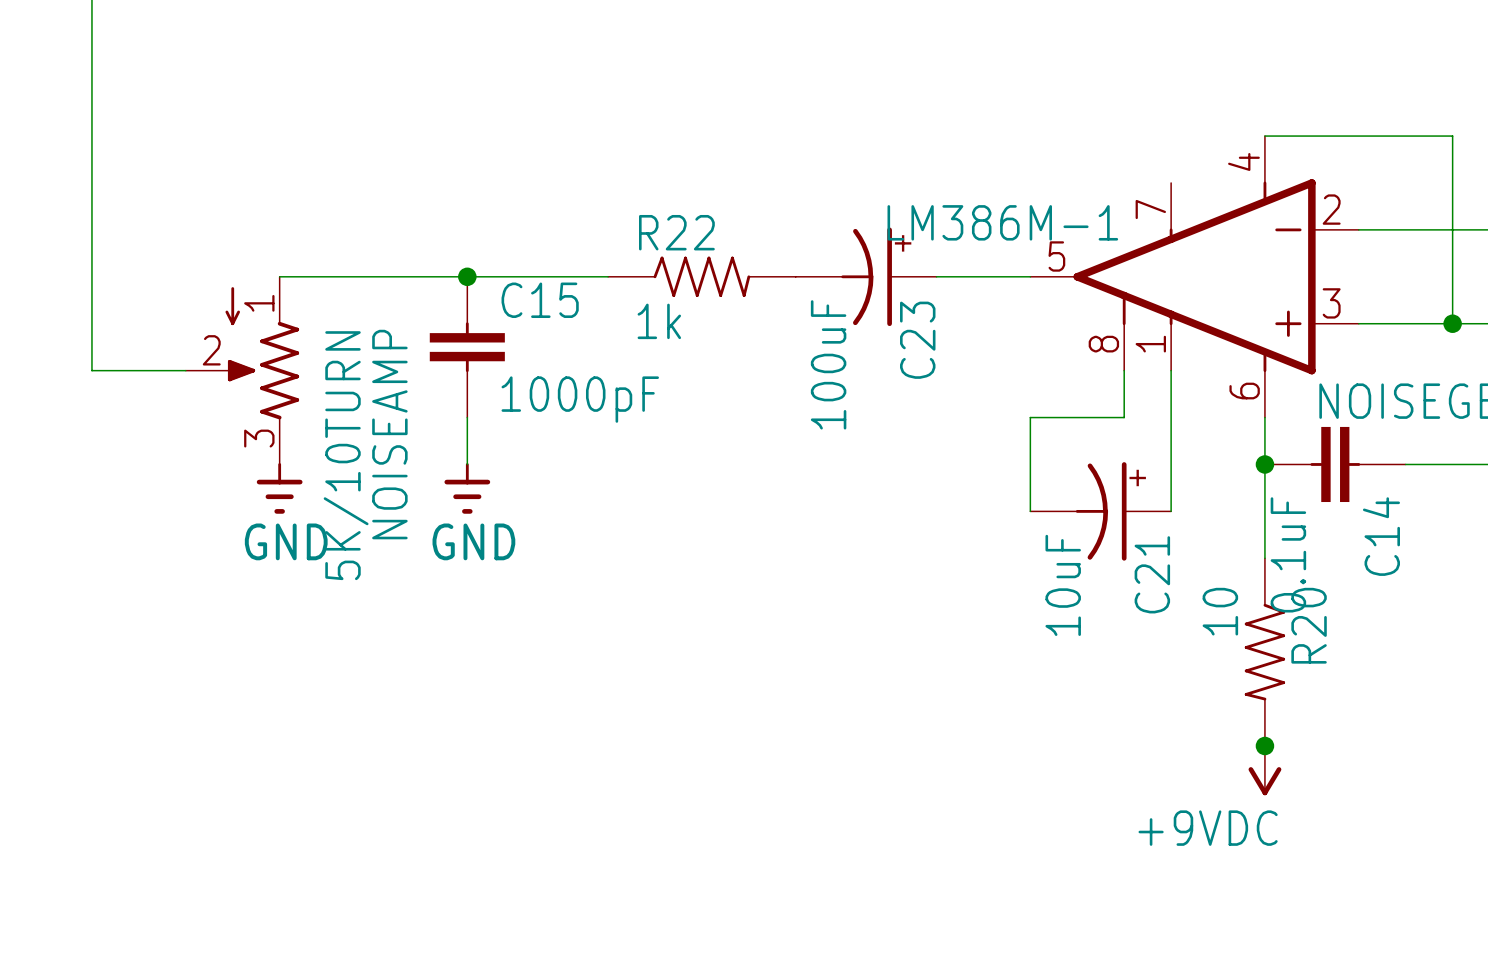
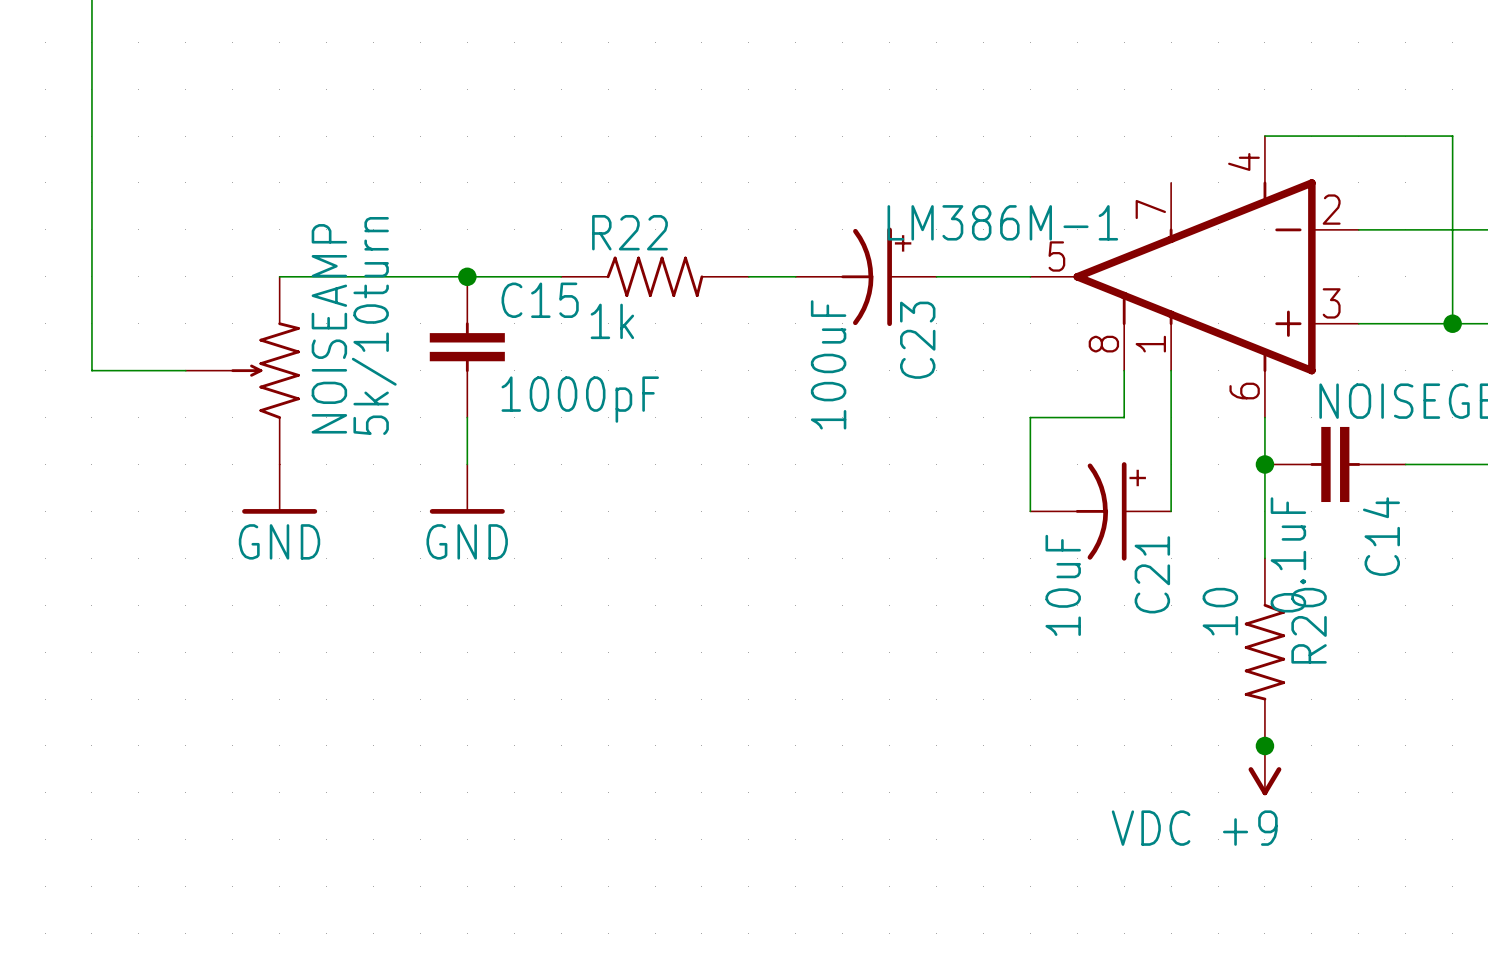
NOISEAMP symbol: [185, 276, 300, 465] -> [185, 276, 300, 465]
R22 position: (701, 276) -> (655, 276)
NOISEAMP name position: NOISEAMP (389, 434) -> NOISEAMP (329, 328)
NOISEAMP value: 5K/10TURN (346, 455) -> 5k/10turn (374, 325)
power symbol shape: [256, 463, 303, 514] -> [242, 464, 318, 514]
power symbol shape: [444, 463, 491, 514] -> [429, 464, 505, 514]
power symbol: +9VDC (1264, 770) -> VDC +9 (1264, 770)

